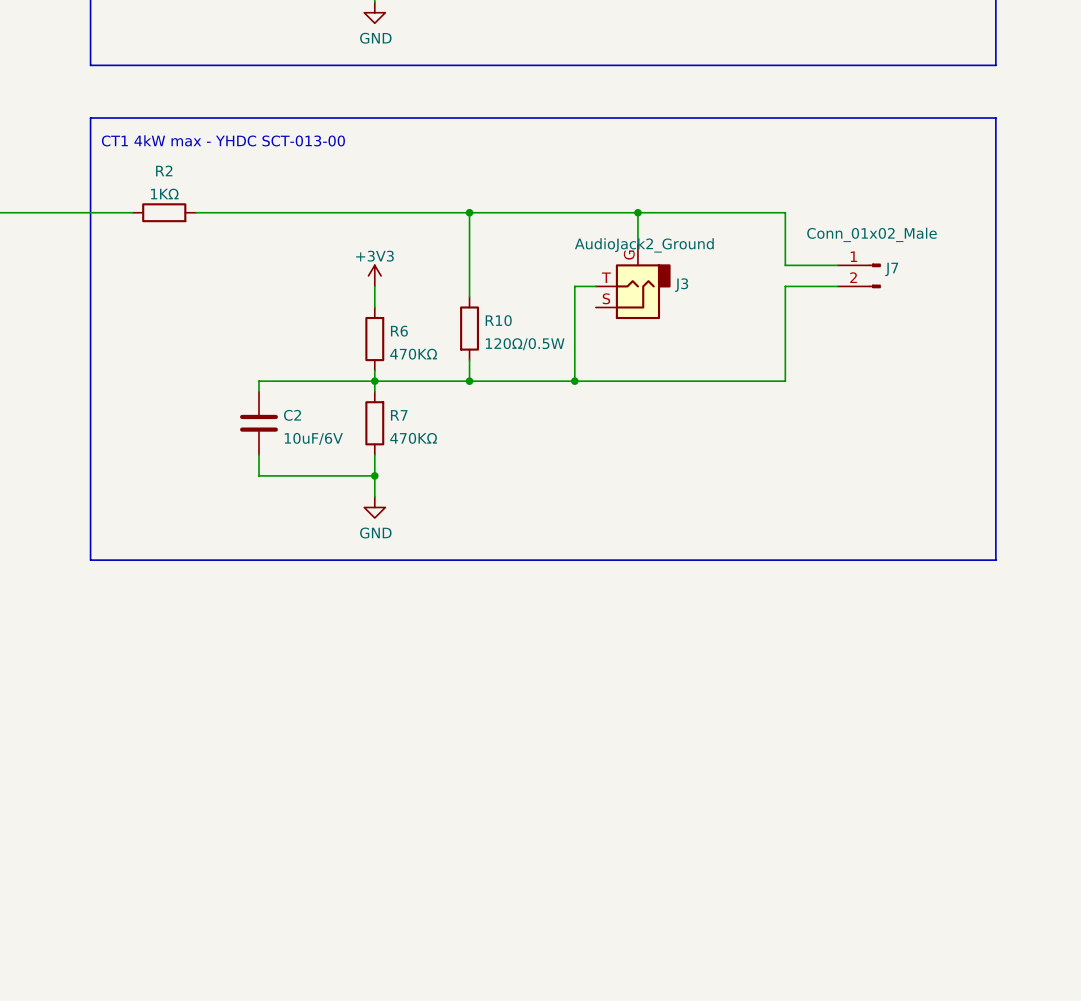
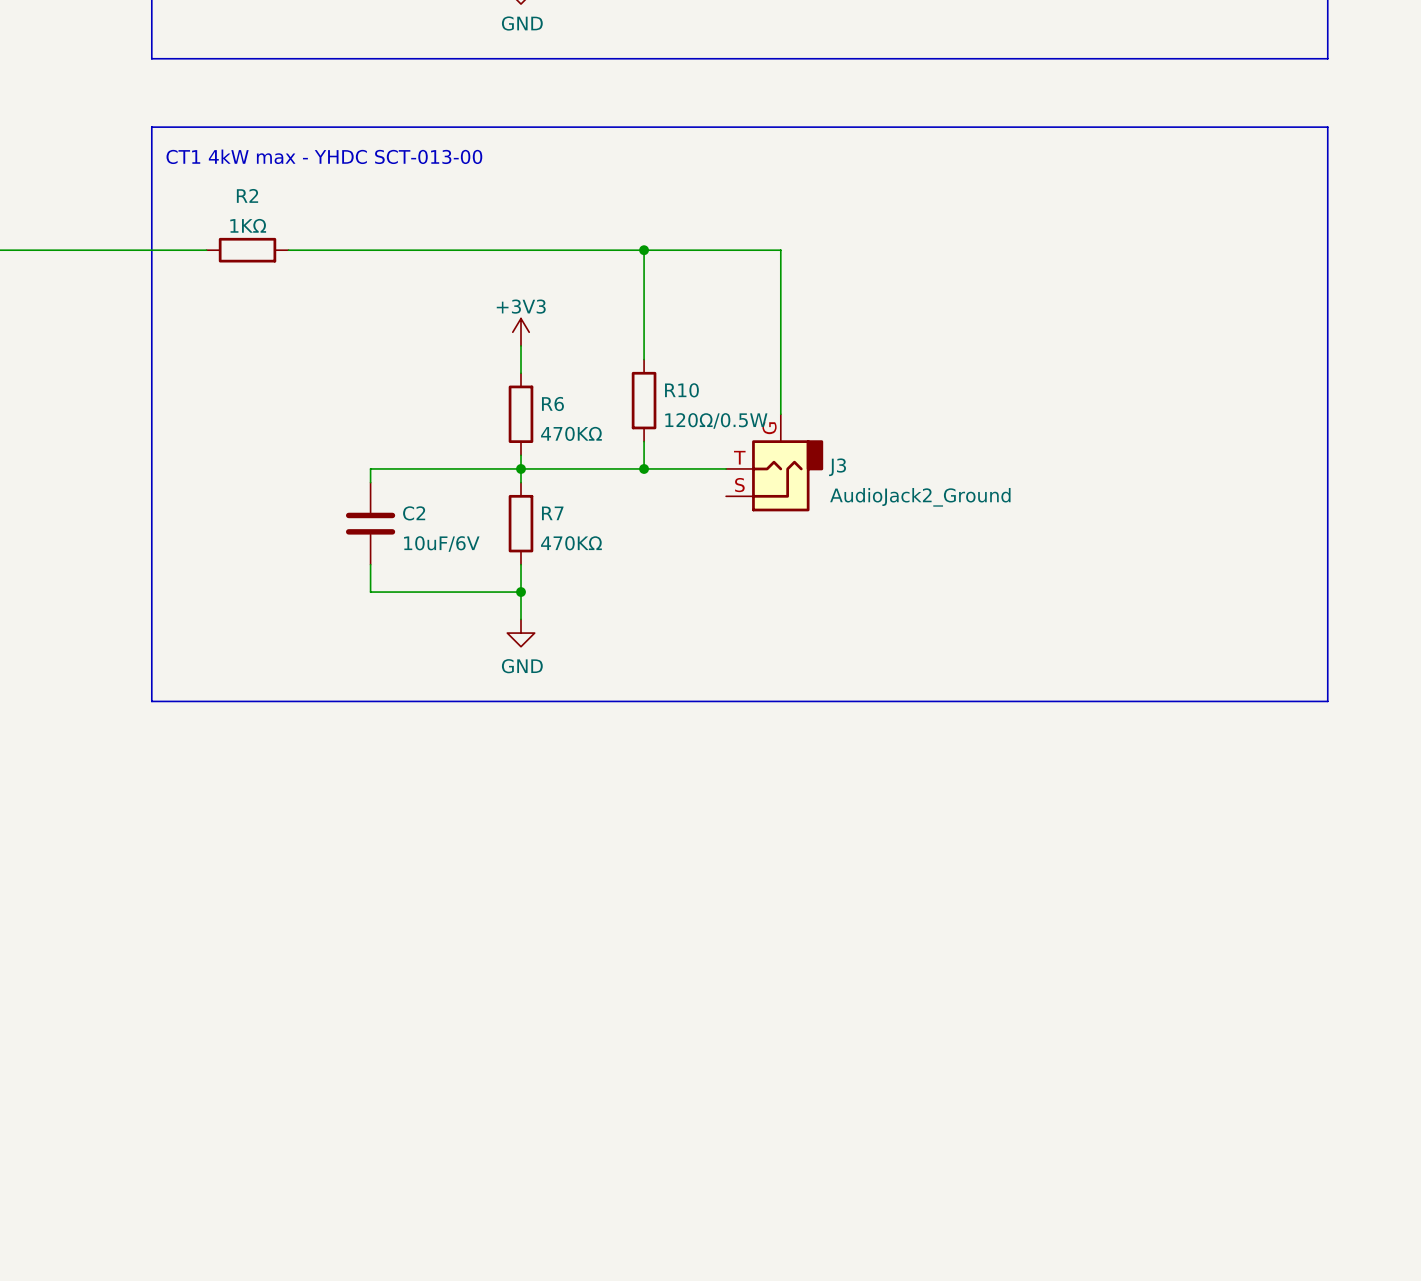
wire: (574, 212) (785, 212) (785, 265) (837, 265) -> none
wire: (637, 212) (637, 244) -> none
junction: (637, 212) -> none
J3 value position: AudioJack2_Ground (644, 245) -> AudioJack2_Ground (920, 497)
J7: Conn_01x02_Male (859, 275) -> none
J3 position: (633, 281) -> (774, 462)
wire: (574, 286) (595, 286) -> (780, 345) (780, 250)
wire: (837, 286) (785, 286) (785, 381) (532, 381) -> none
junction: (574, 381) -> none

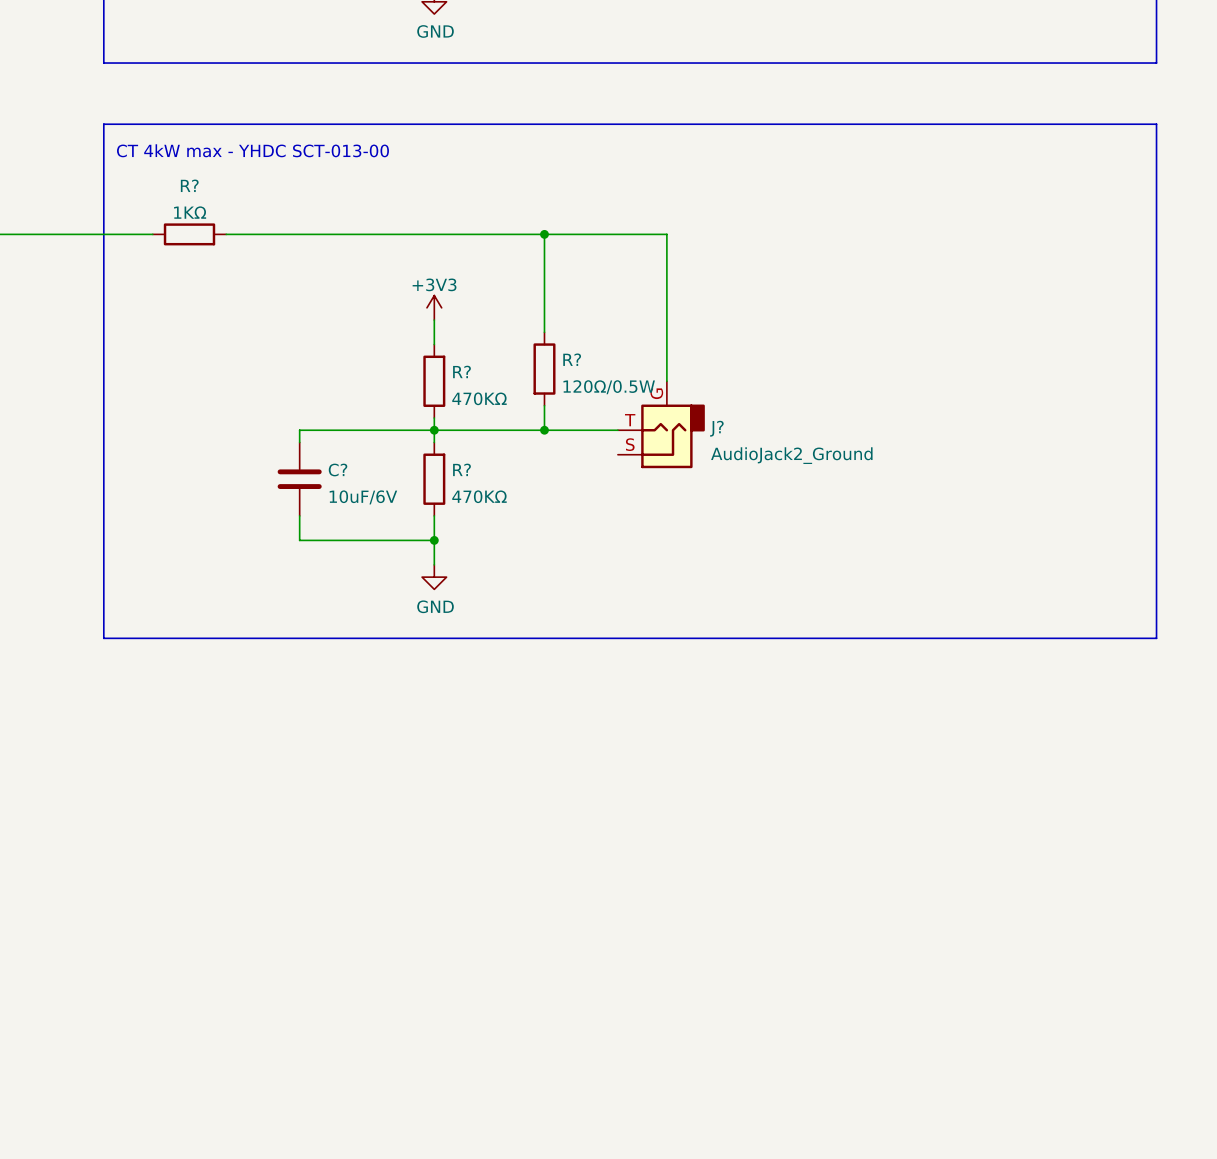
text: CT1 4kW max - YHDC SCT-013-00 (324, 156) -> CT 4kW max - YHDC SCT-013-00 (252, 150)
R2 name: R2 (247, 195) -> R? (189, 185)
R10 name: R10 (681, 390) -> R? (572, 359)
R6 name: R6 (552, 403) -> R? (461, 371)
J3 name: J3 (837, 467) -> J? (716, 428)
C2 name: C2 (414, 513) -> C? (338, 470)
R7 name: R7 (552, 513) -> R? (461, 469)

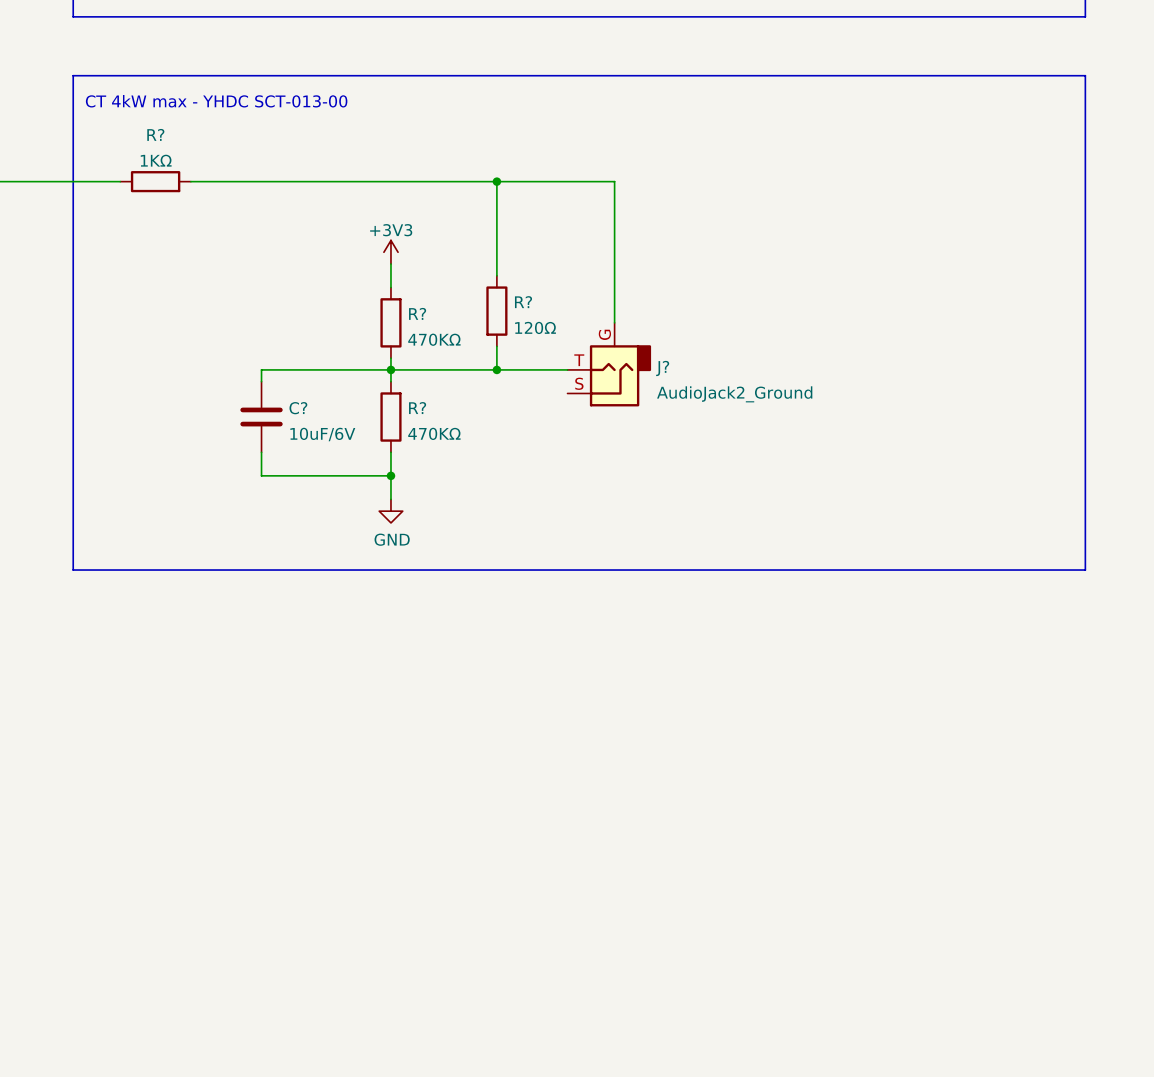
R? value: 120Ω/0.5W (609, 387) -> 120Ω (535, 327)

